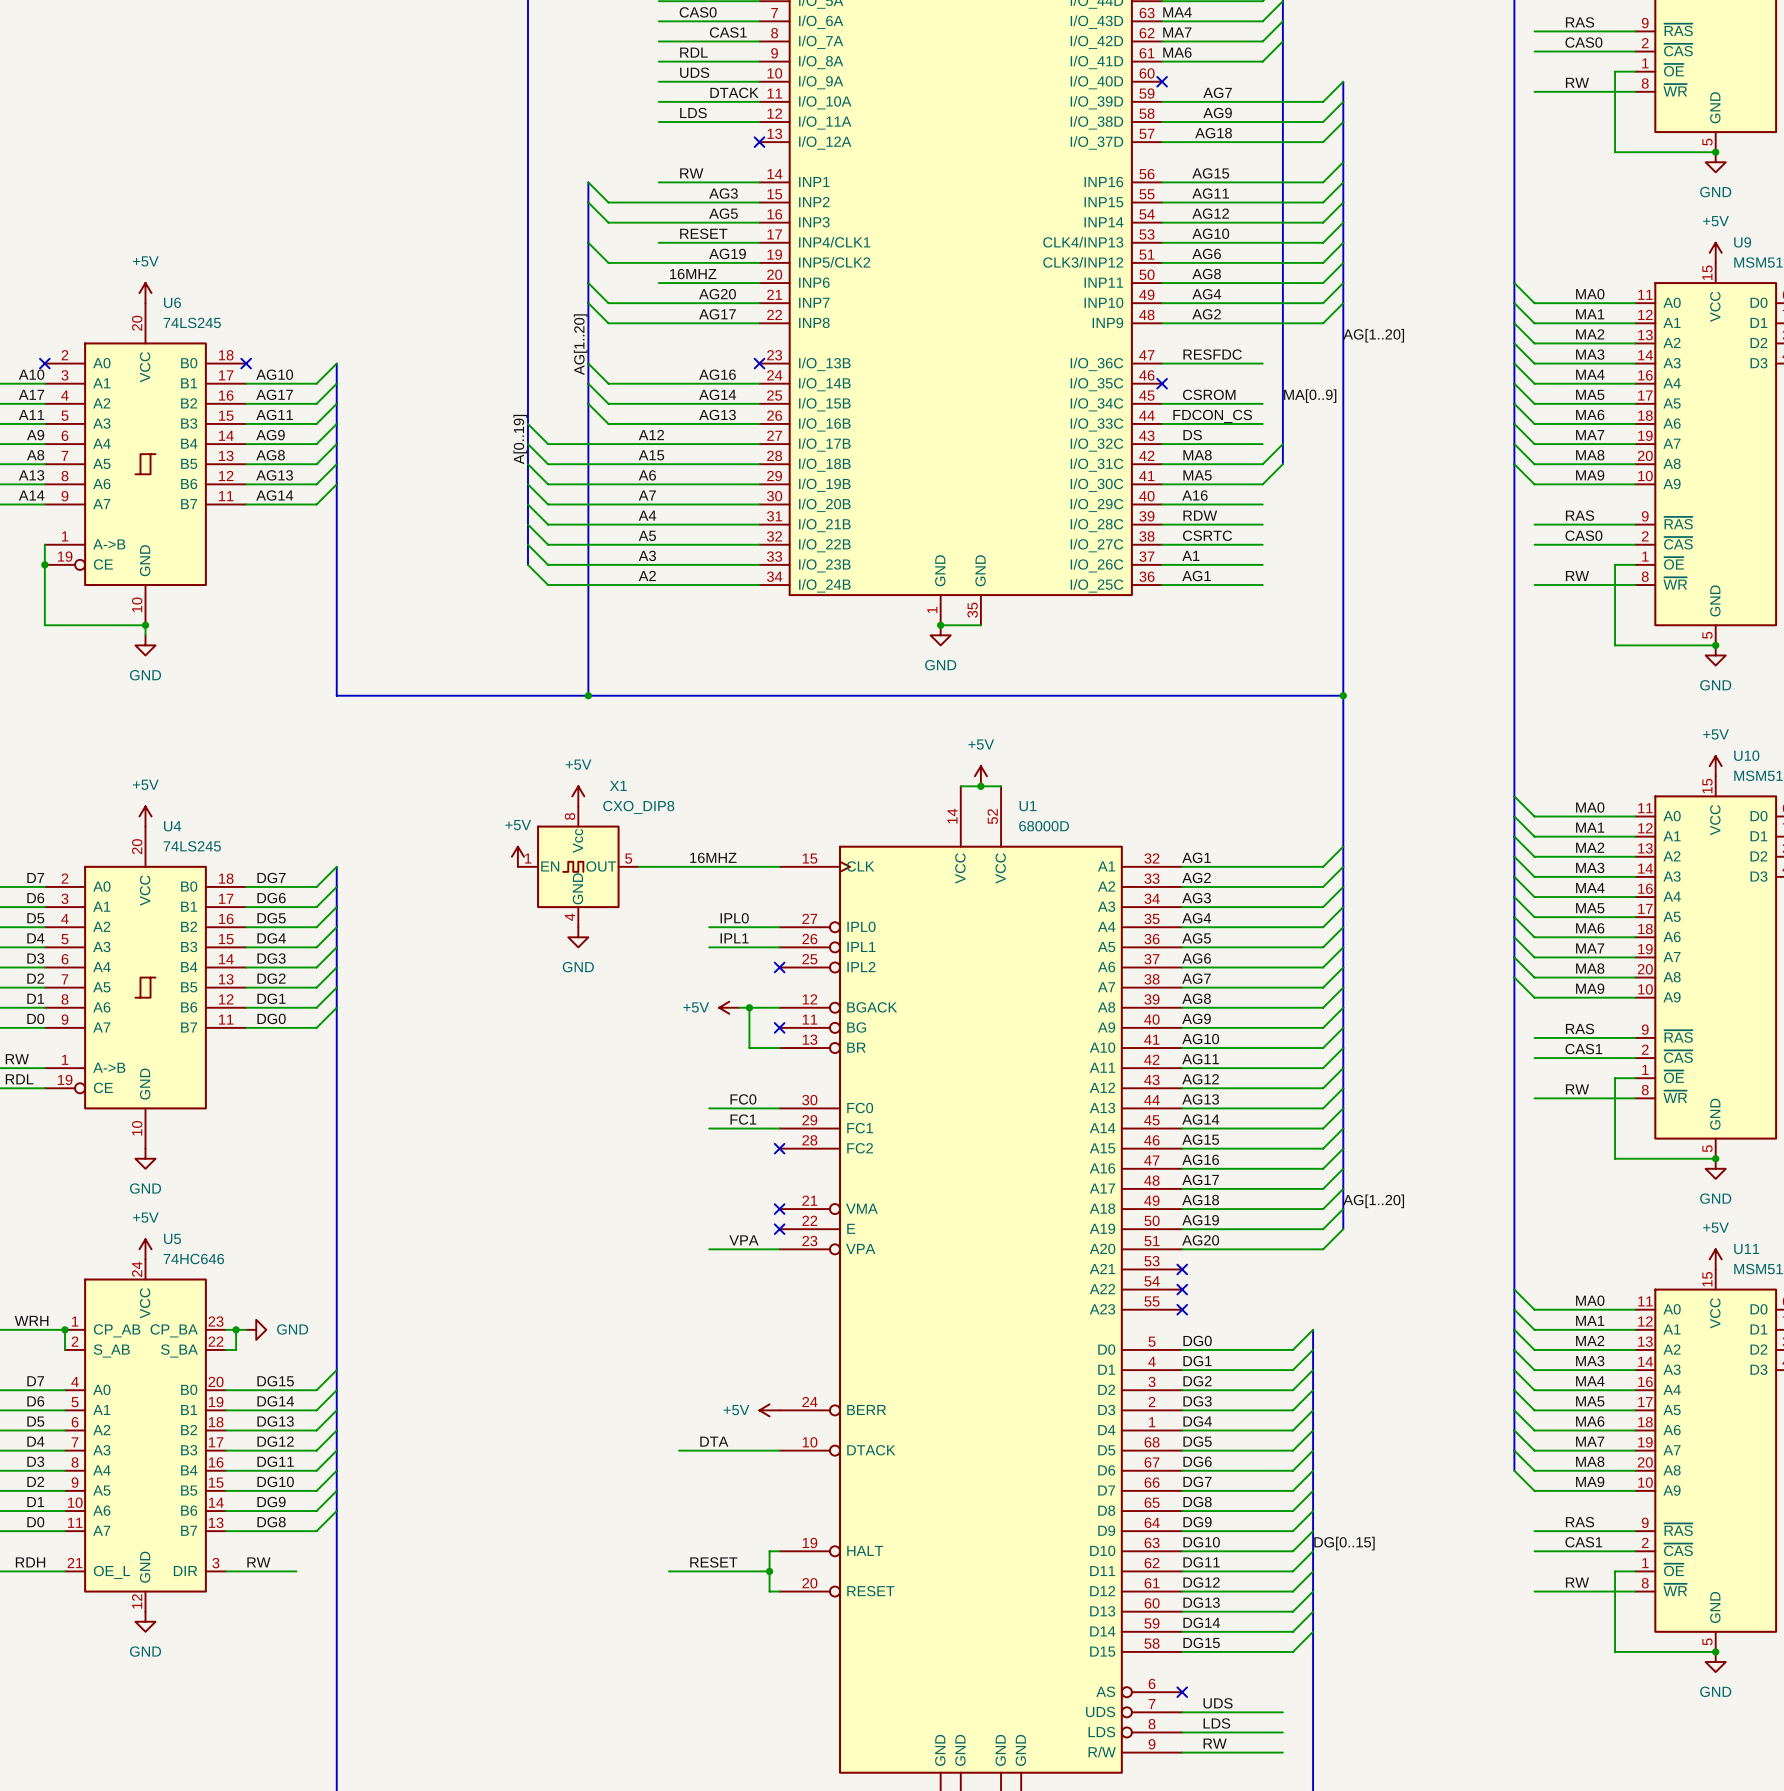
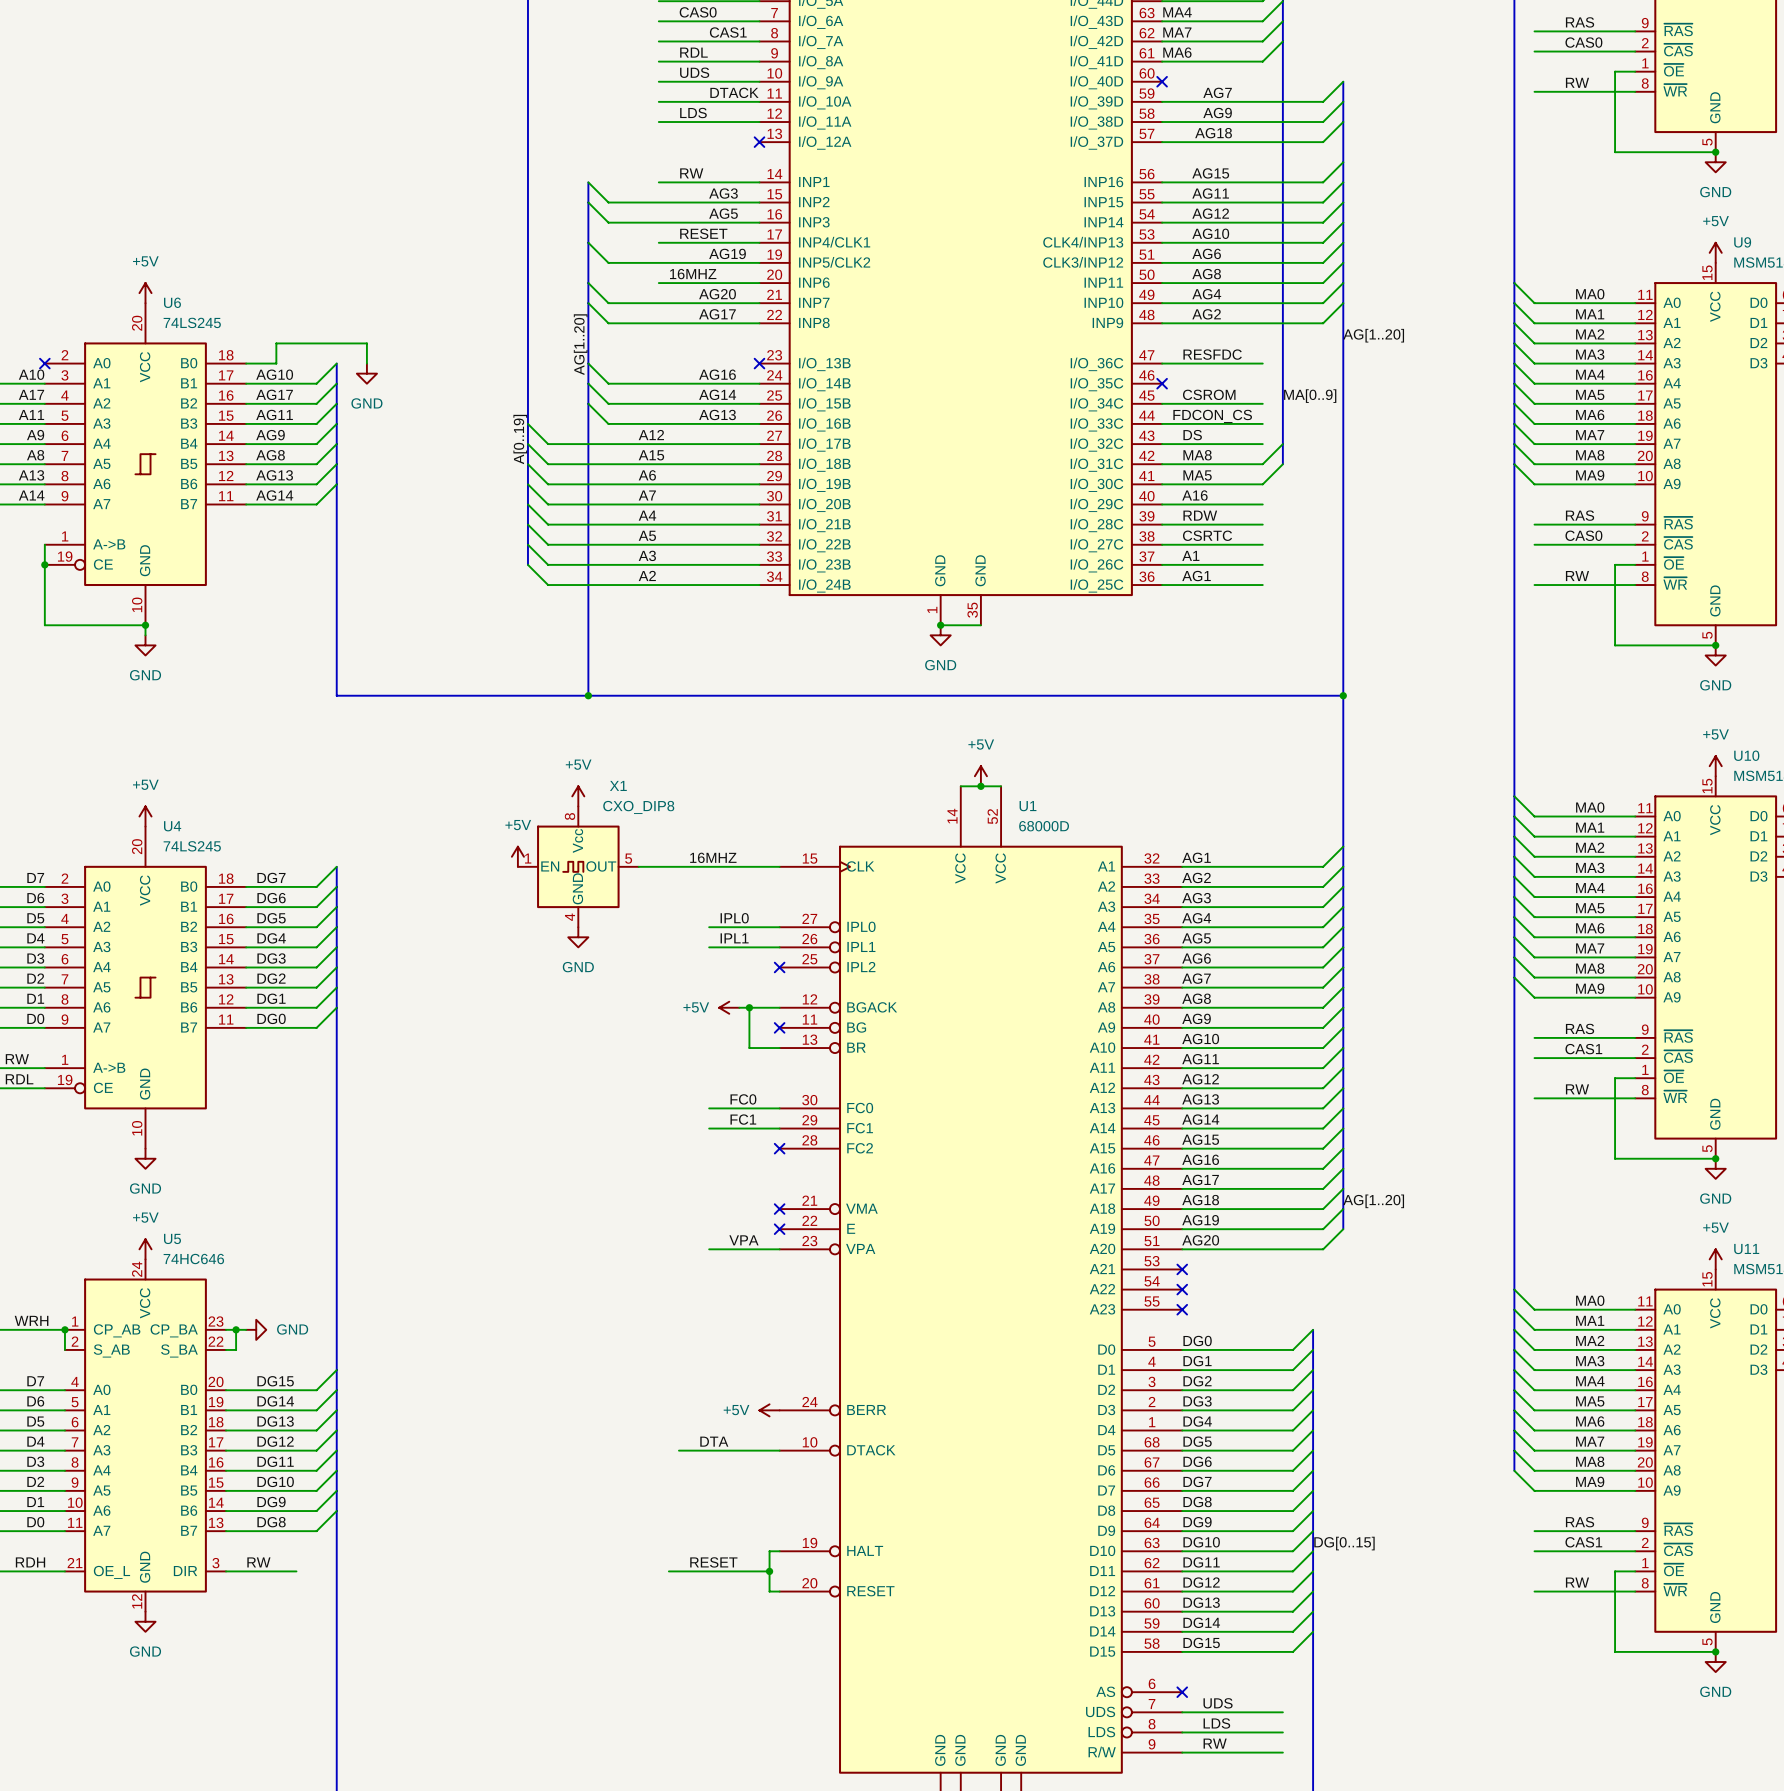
wire: none -> (246, 363) (276, 363) (276, 343) (366, 343) (366, 363)
no-connect mark: (246, 363) -> none
power symbol: none -> GND (366, 373)

